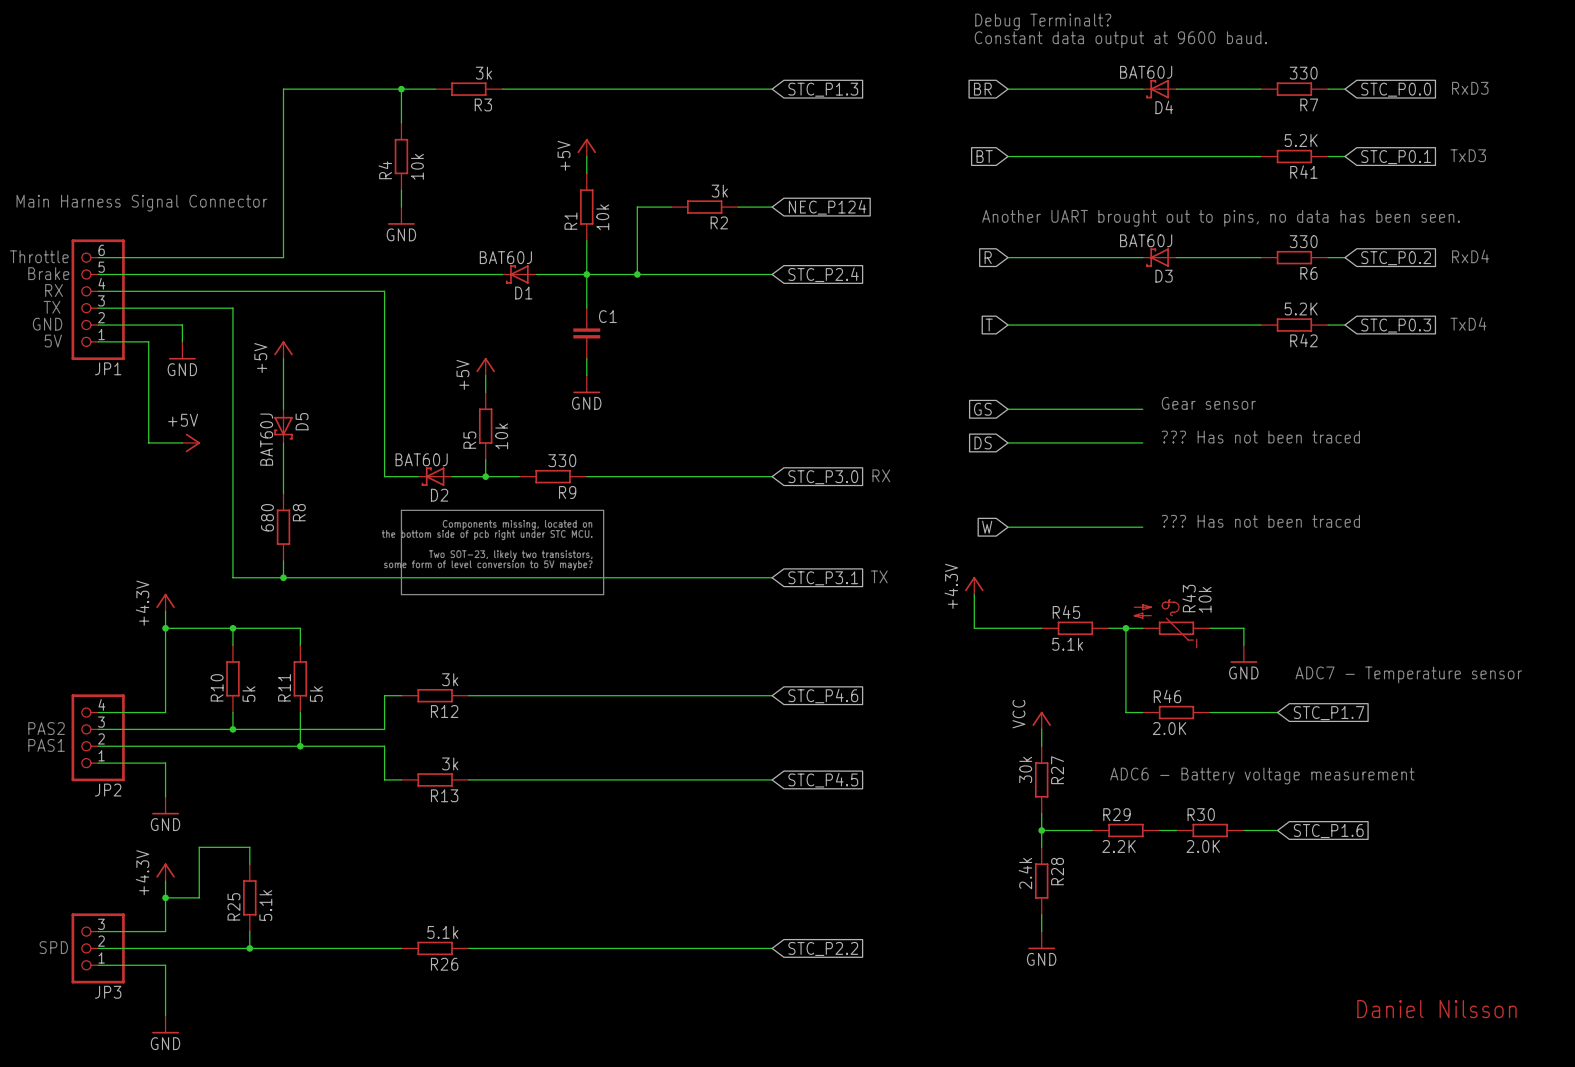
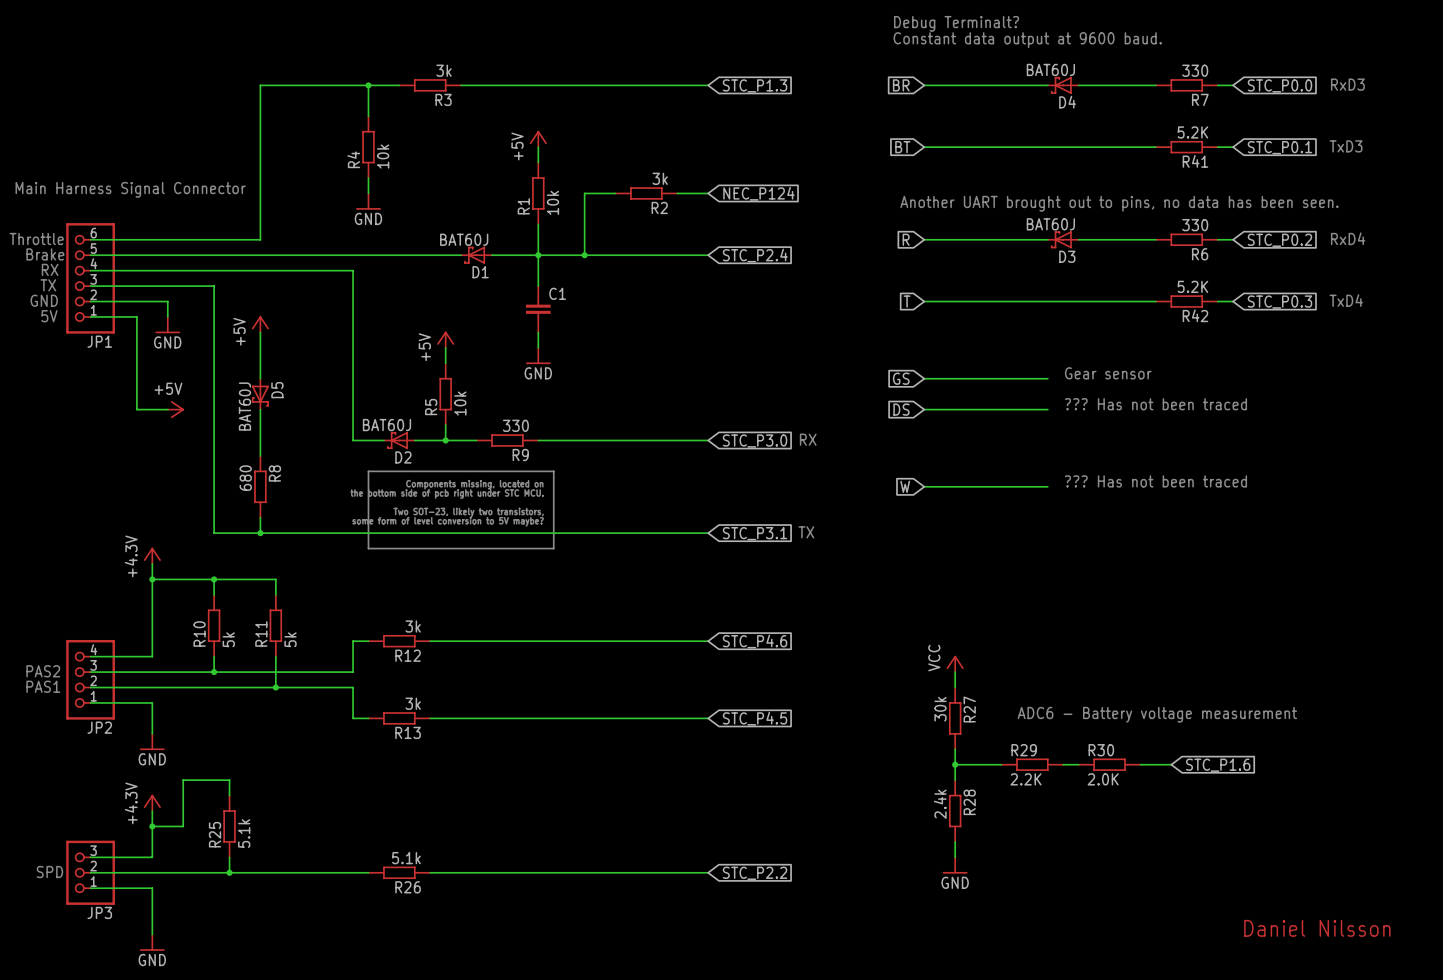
power symbol: +4.3V (974, 585) -> none
wire: (974, 594) (974, 628) (1041, 628) -> none
R43: 10k (1172, 623) -> none
R45: 5.1k (1075, 628) -> none
wire: (1109, 628) (1142, 628) -> none
wire: (1125, 628) (1125, 712) (1142, 712) -> none
junction: (1125, 628) -> none
wire: (1210, 628) (1243, 628) (1243, 645) -> none
power symbol: GND (1243, 654) -> none
text: ADC7 - Temperature sensor (1408, 674) -> none
R46: 2.0K (1176, 712) -> none
wire: (1210, 712) (1277, 712) -> none
global label: STC_P1.7 (1329, 713) -> none

